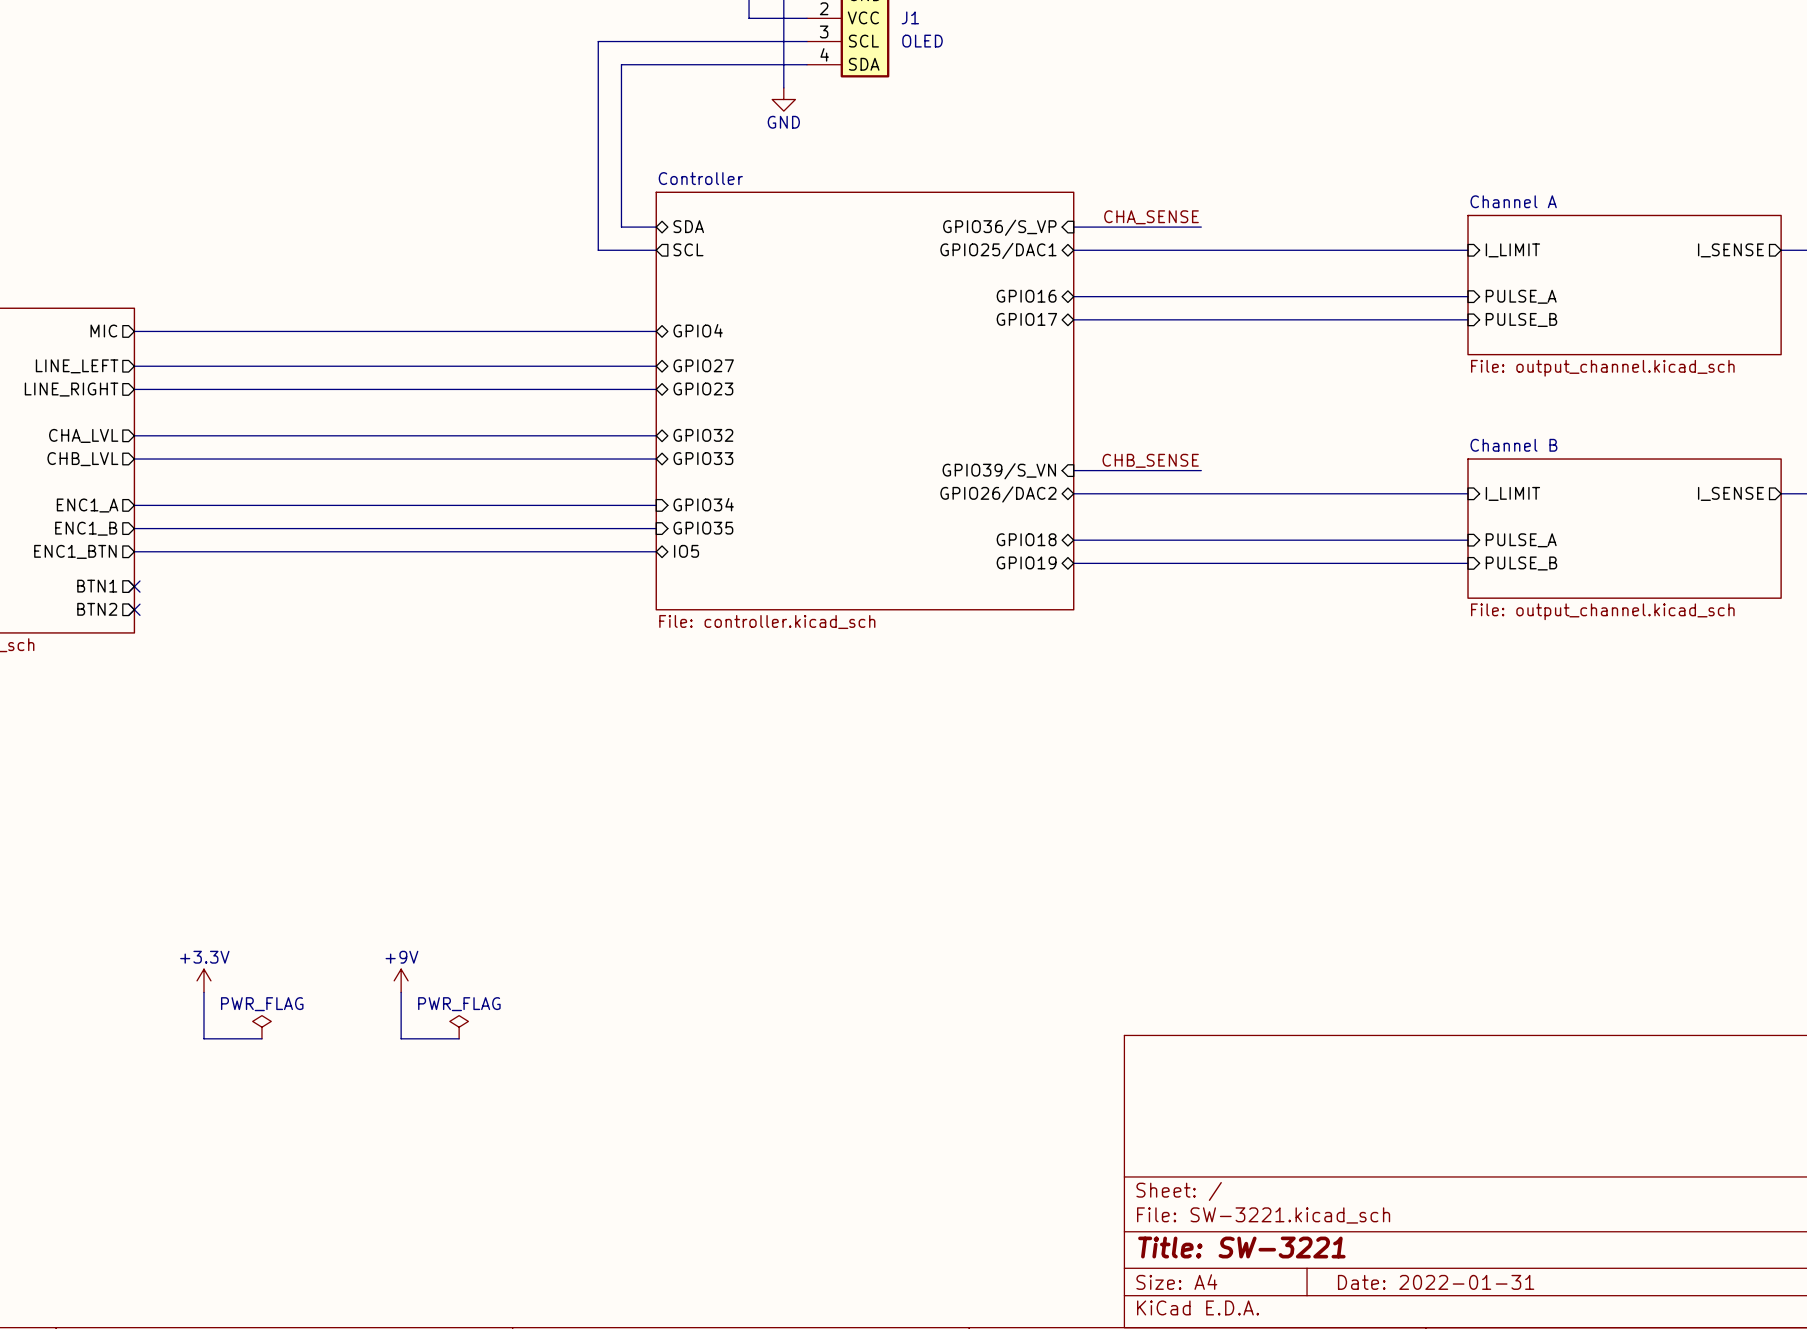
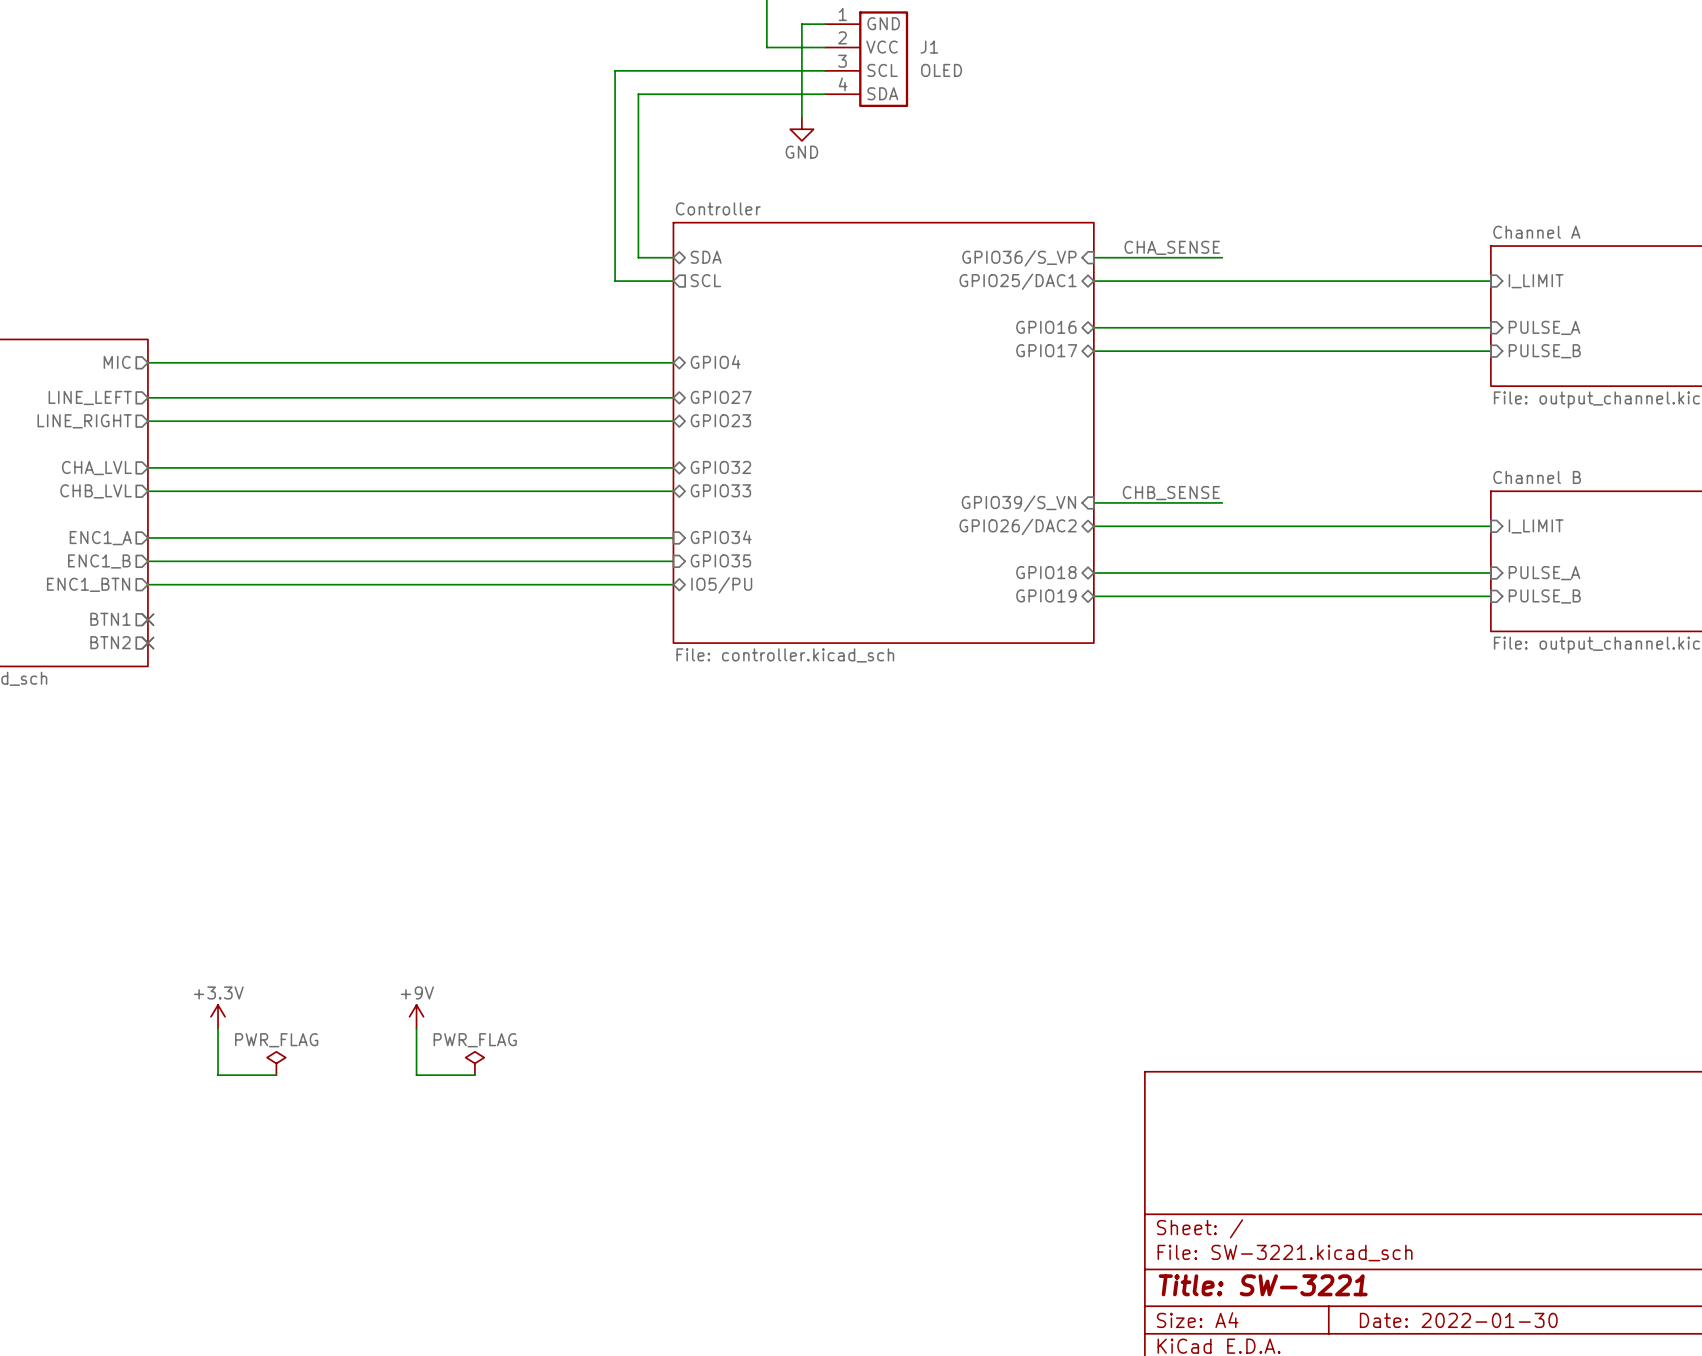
sheet pin: IO5 (686, 551) -> IO5/PU (721, 585)
title block: Date: 2022-01-31 (1436, 1282) -> Date: 2022-01-30 (1458, 1320)

